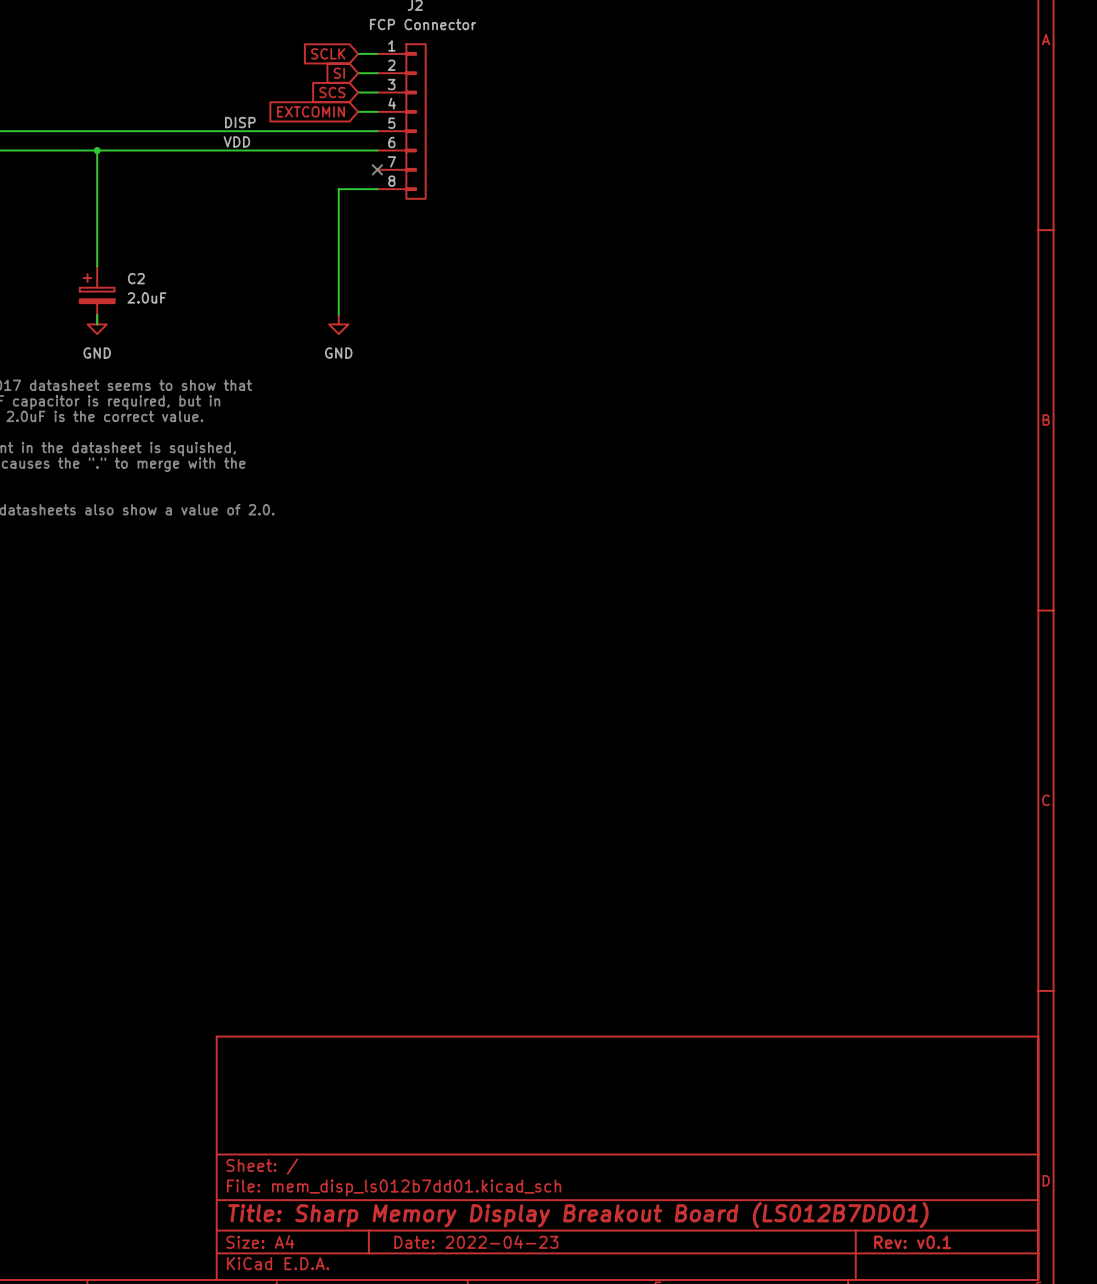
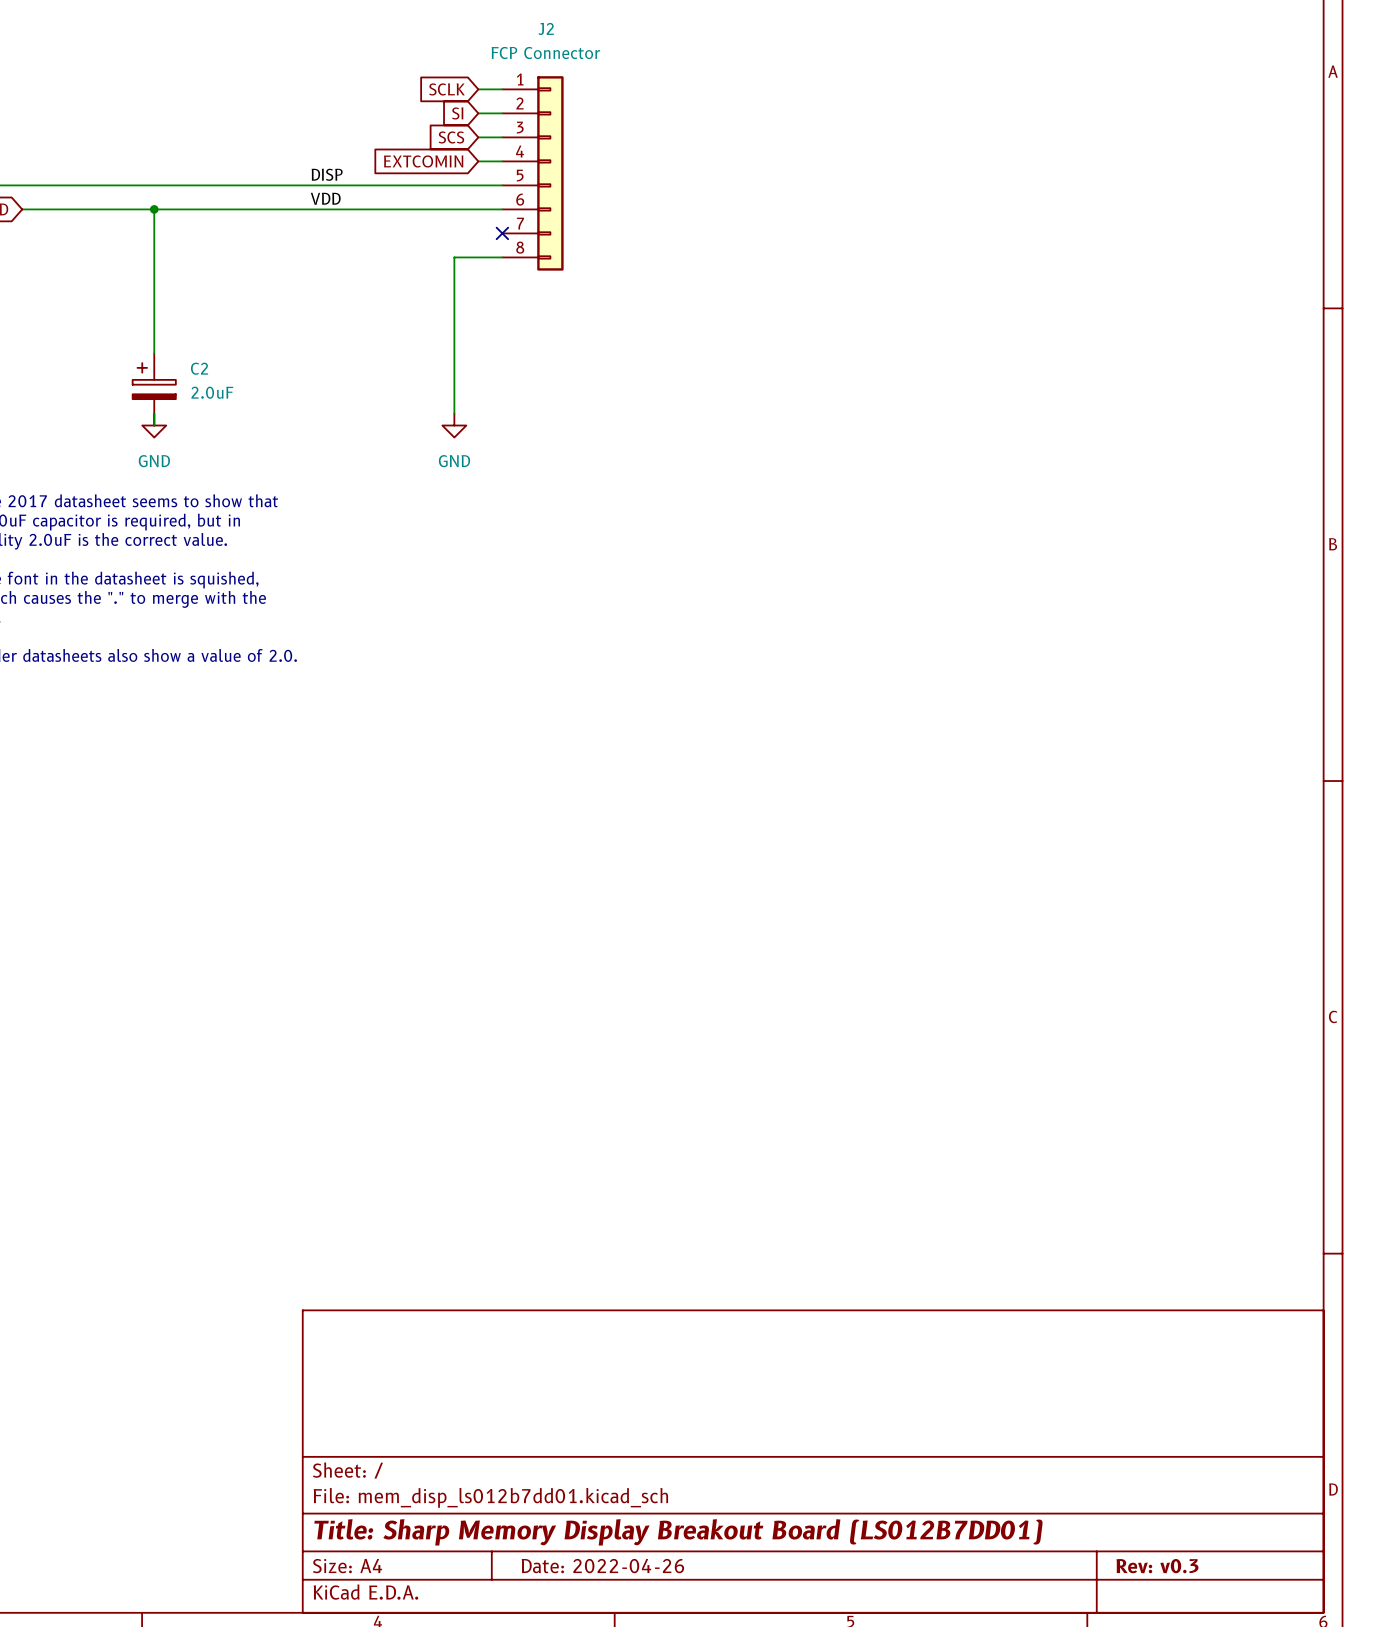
title block: Date: 2022-04-23 (476, 1242) -> Date: 2022-04-26 (602, 1566)
title block: Rev: v0.1 (912, 1242) -> Rev: v0.3 (1157, 1566)

